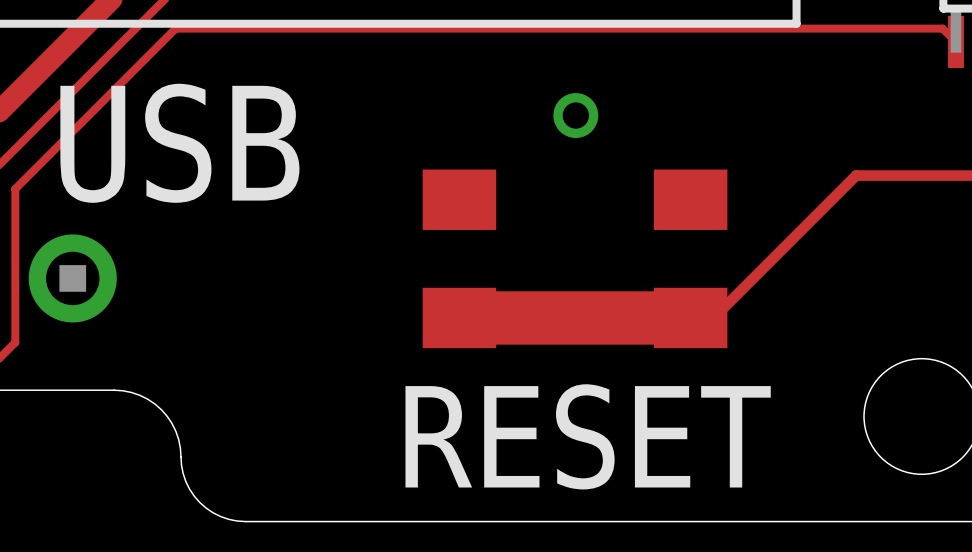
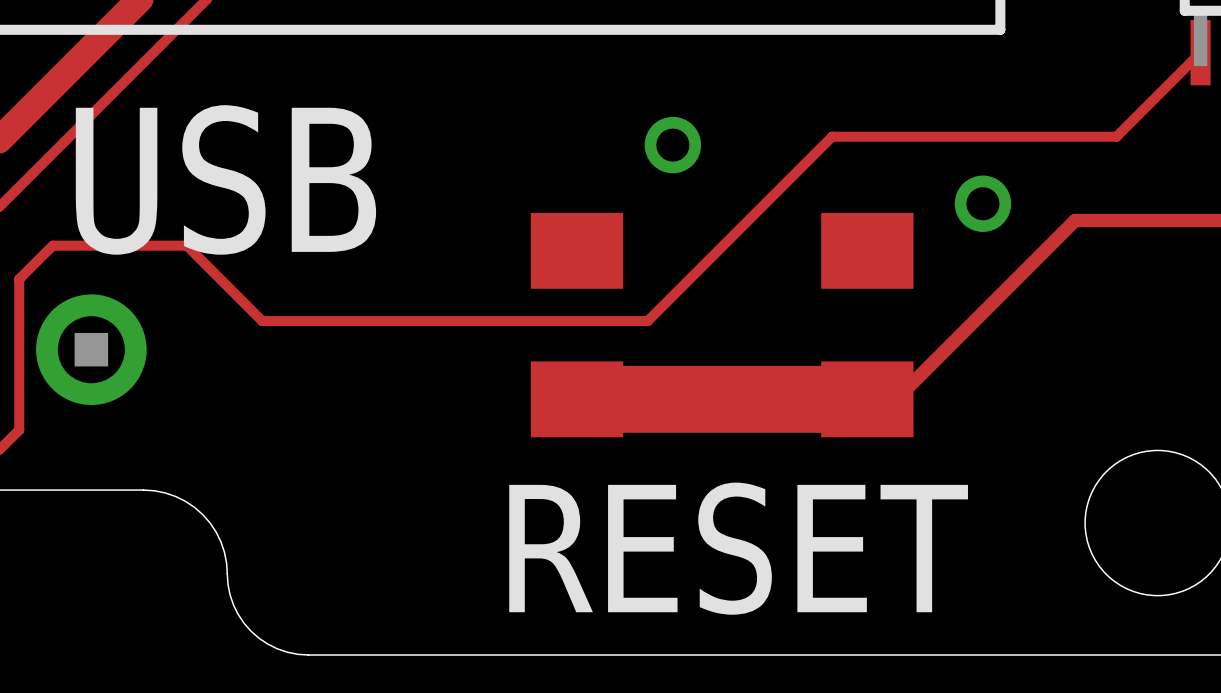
track: (955, 41) (942, 28) (175, 28) (15, 188) (15, 222) -> (1200, 52) (1116, 136) (832, 136) (647, 321) (262, 321) (186, 245) (52, 245) (19, 279)
via position: (575, 115) -> (672, 145)
via: none -> (982, 203)

